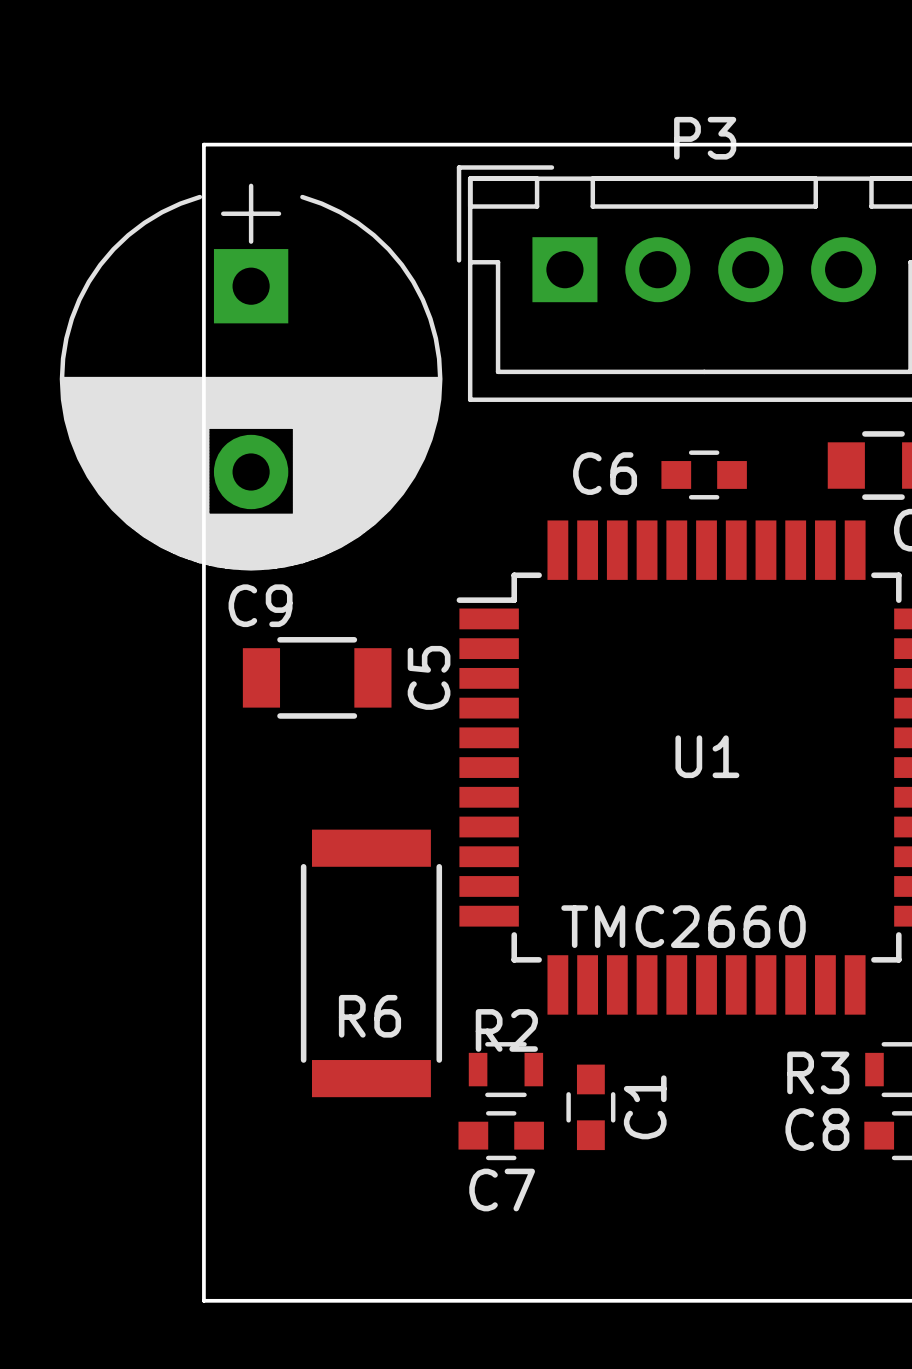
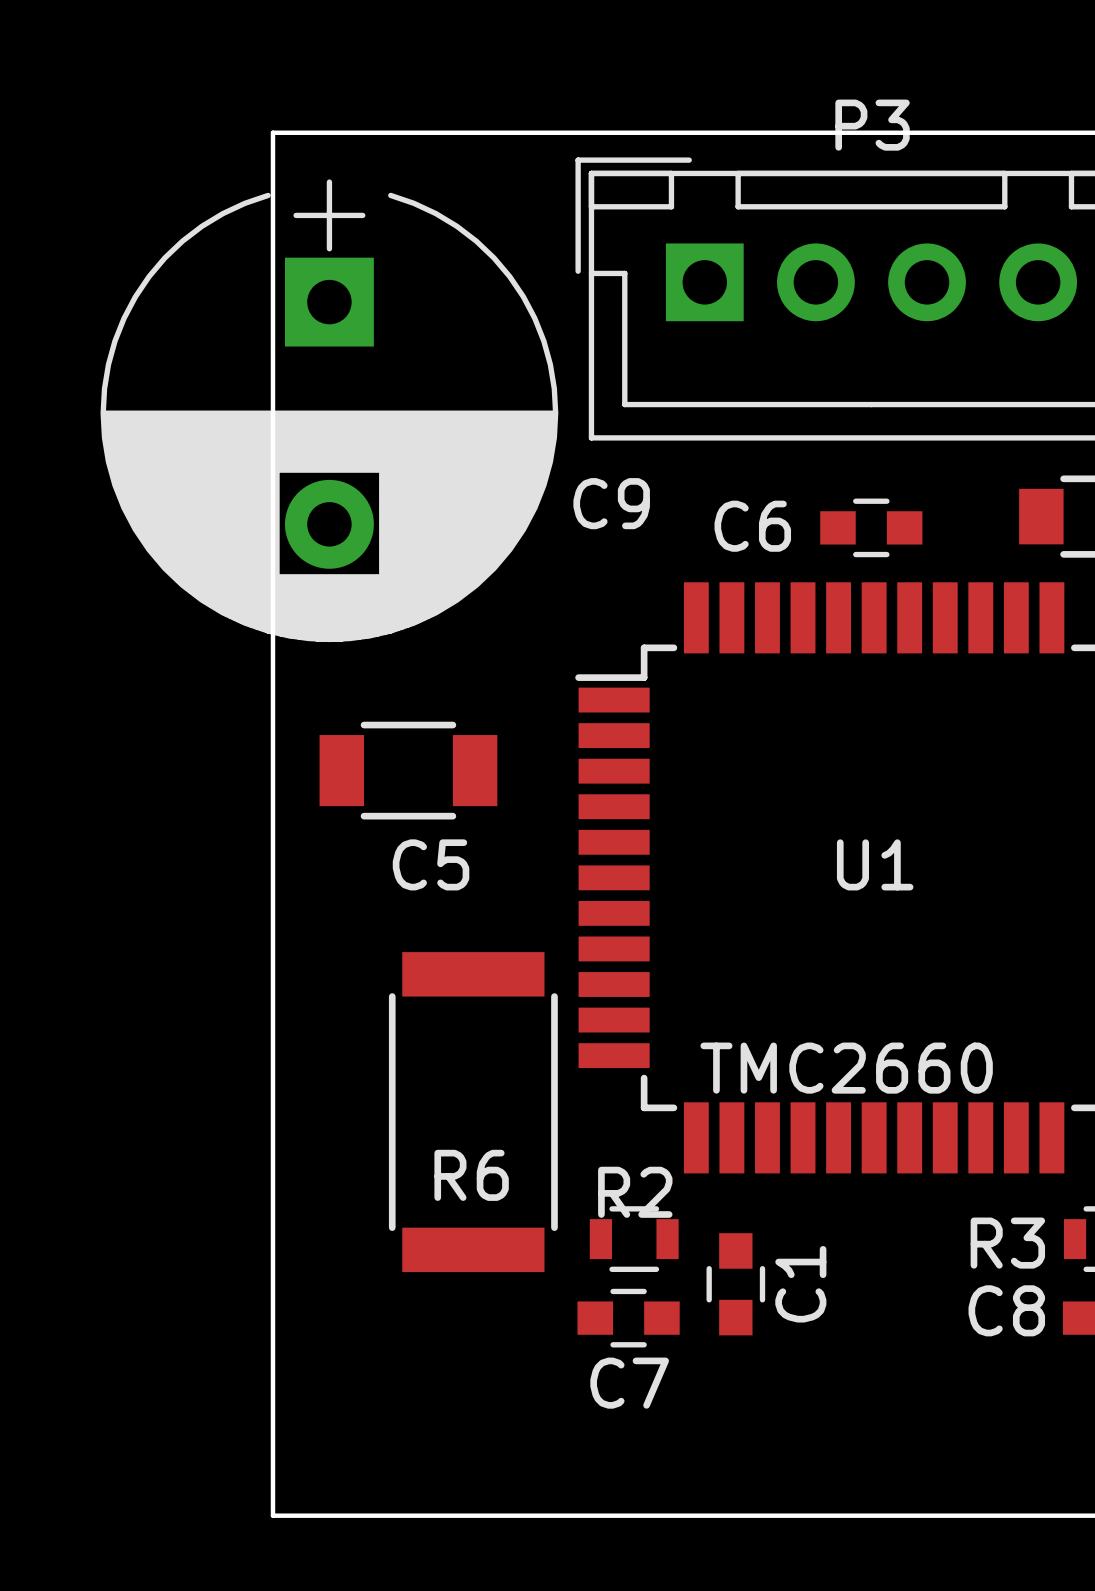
C9 name position: C9 (260, 605) -> C9 (611, 503)
C5 name rotation: 0° (429, 677) -> 90° clockwise (431, 864)
C5 name position: C5 (429, 677) -> C5 (431, 864)

